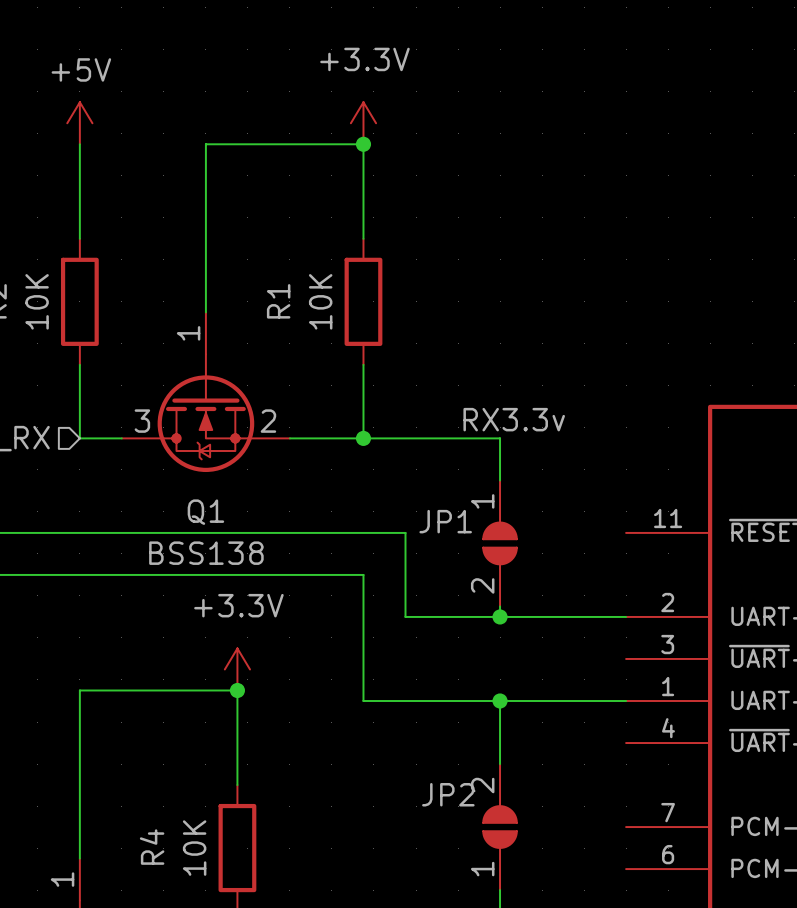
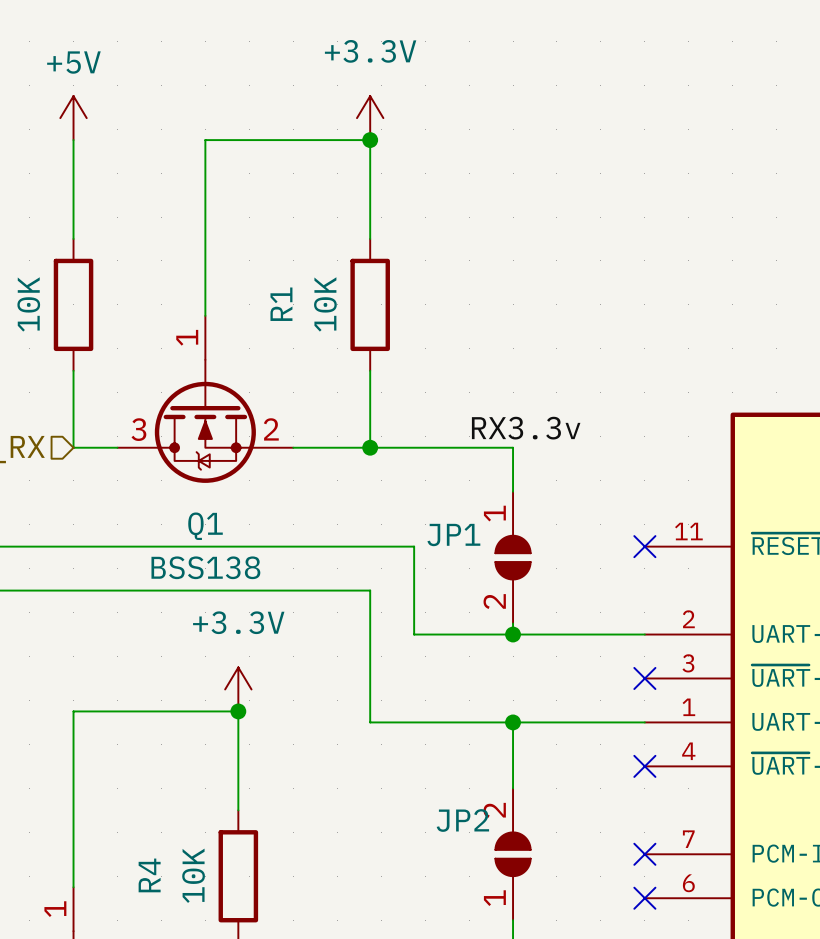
no-connect mark: none -> (644, 546)
no-connect mark: none -> (644, 678)
no-connect mark: none -> (644, 766)
no-connect mark: none -> (644, 854)
no-connect mark: none -> (644, 898)

